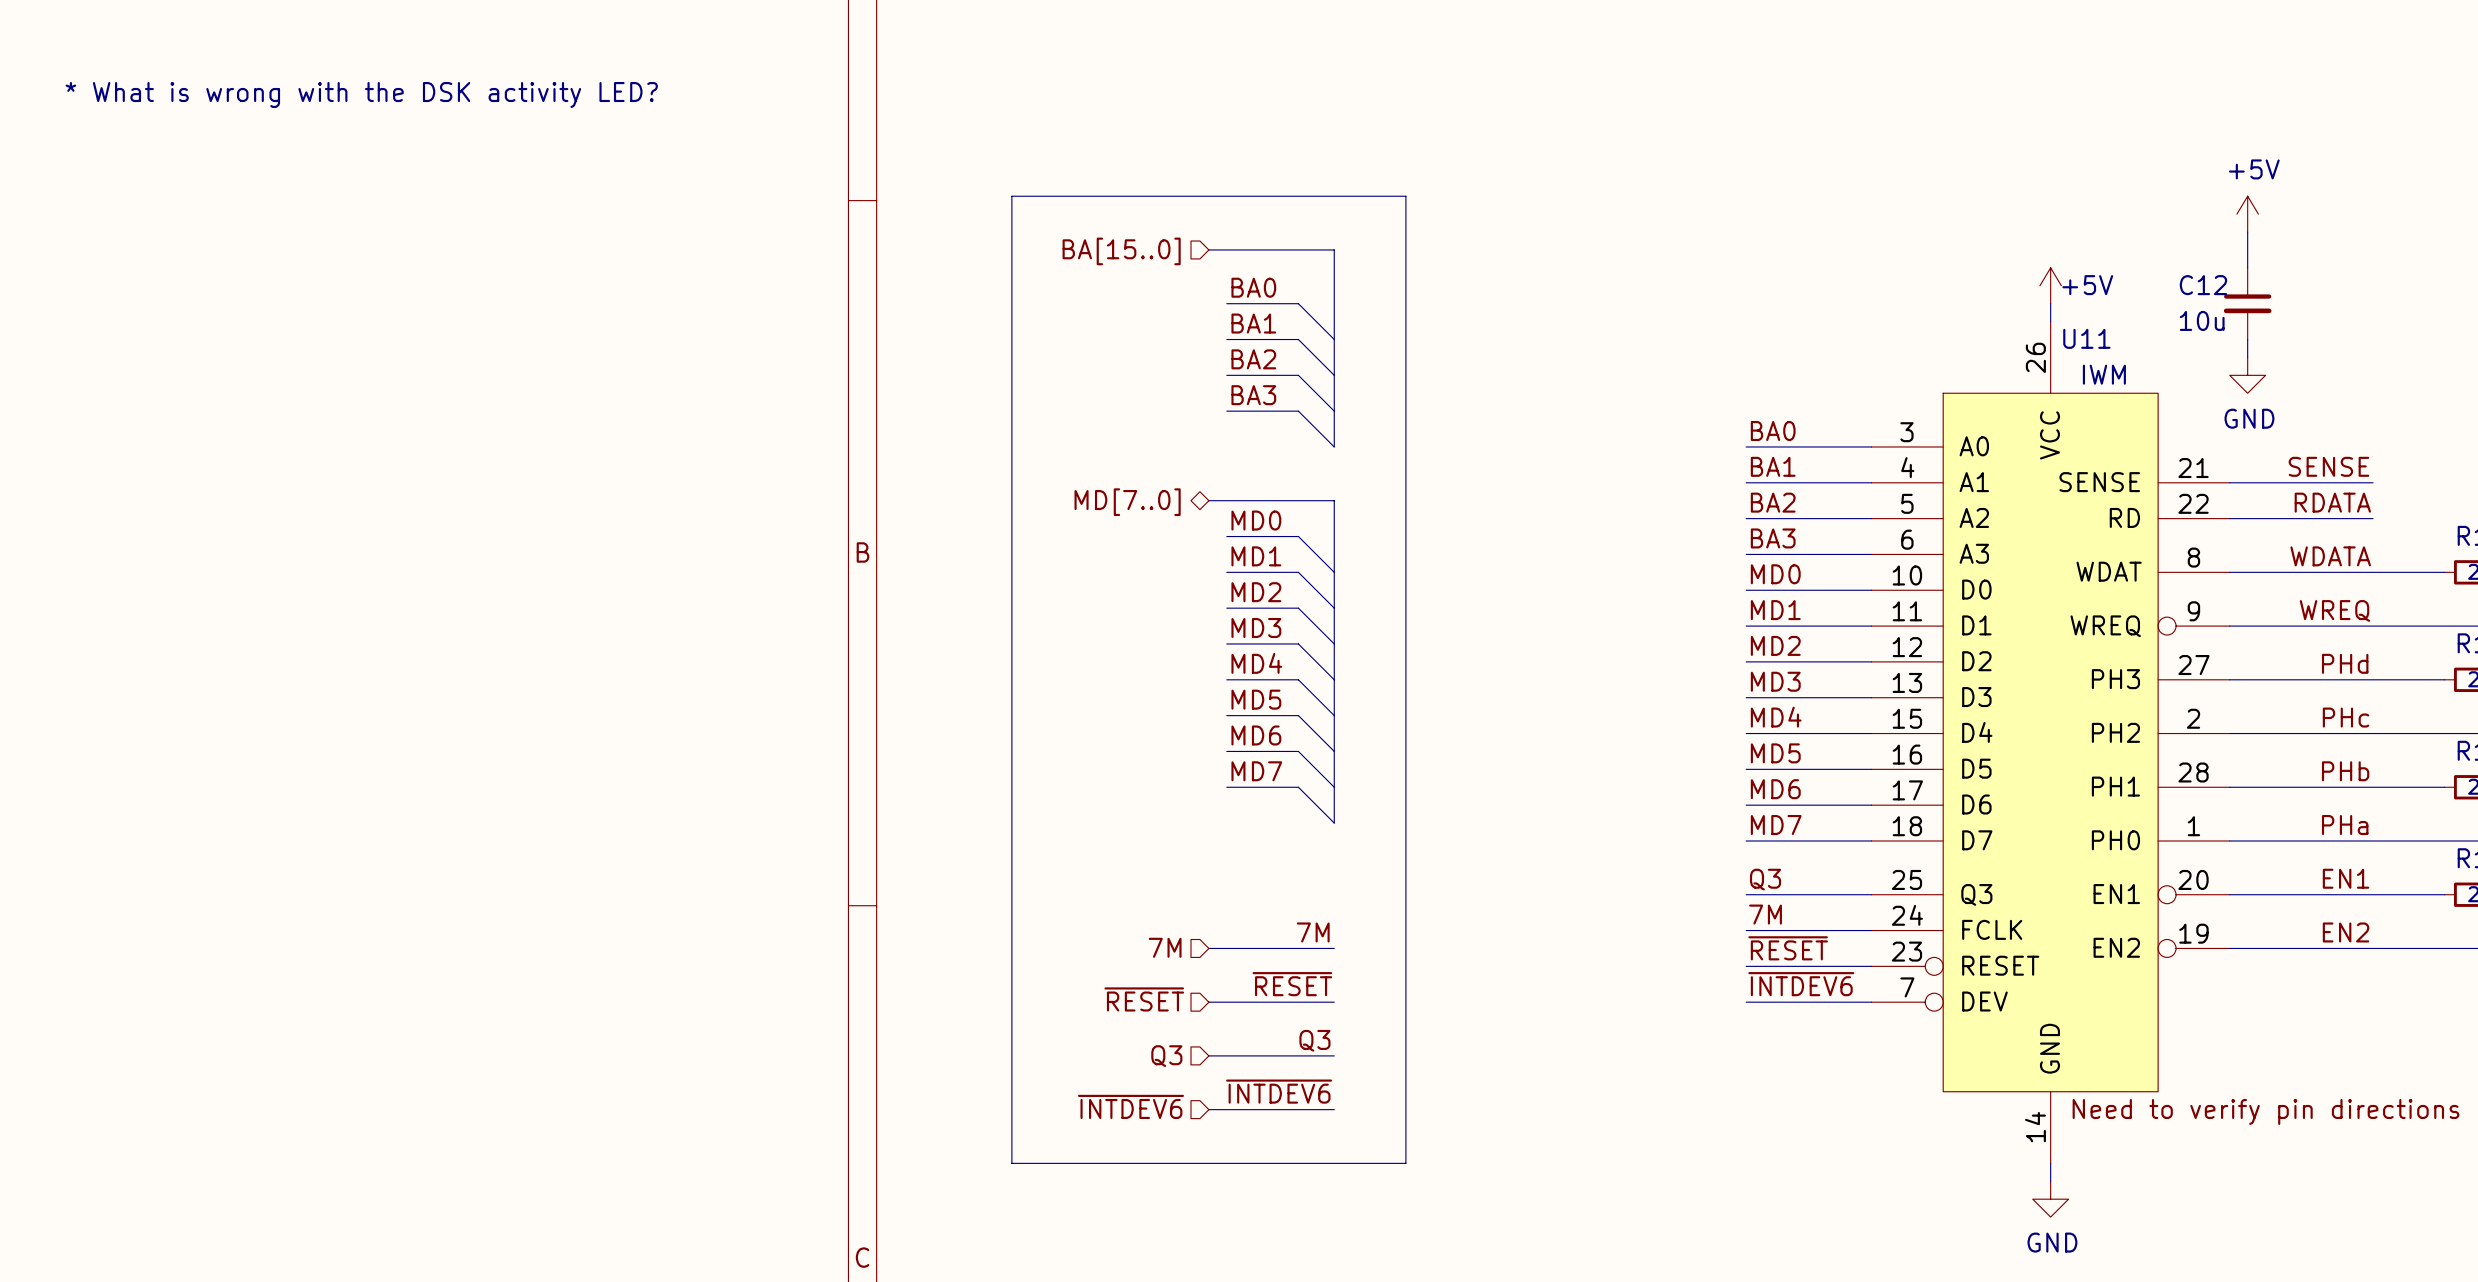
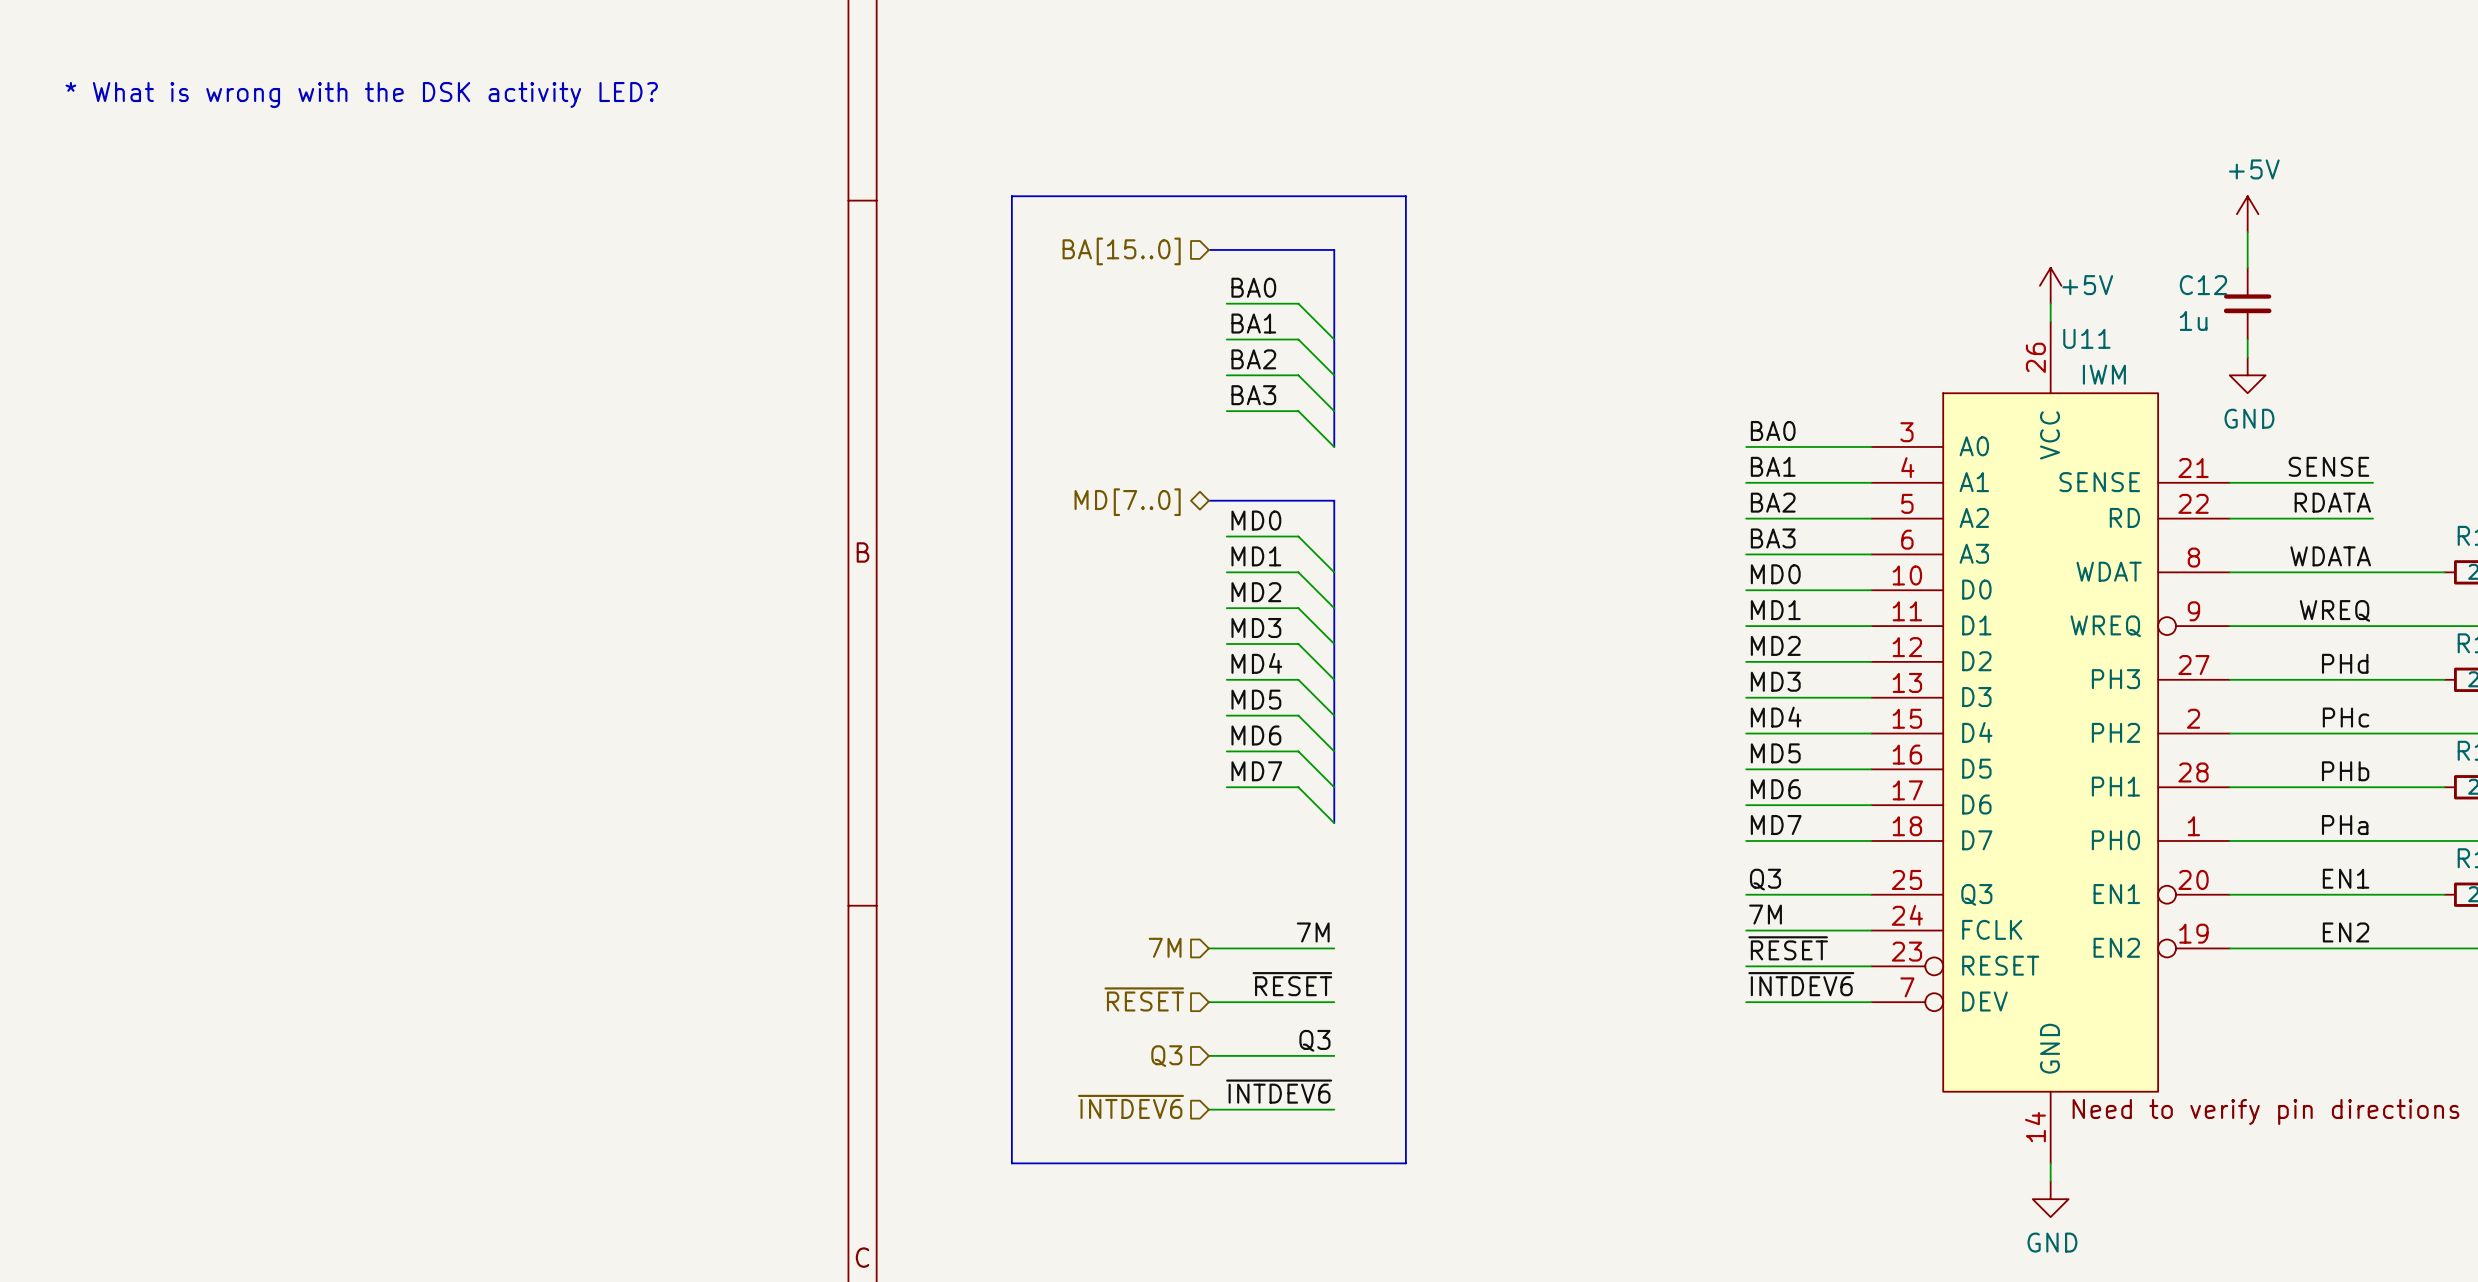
C12 value: 10u (2202, 320) -> 1u (2193, 320)

